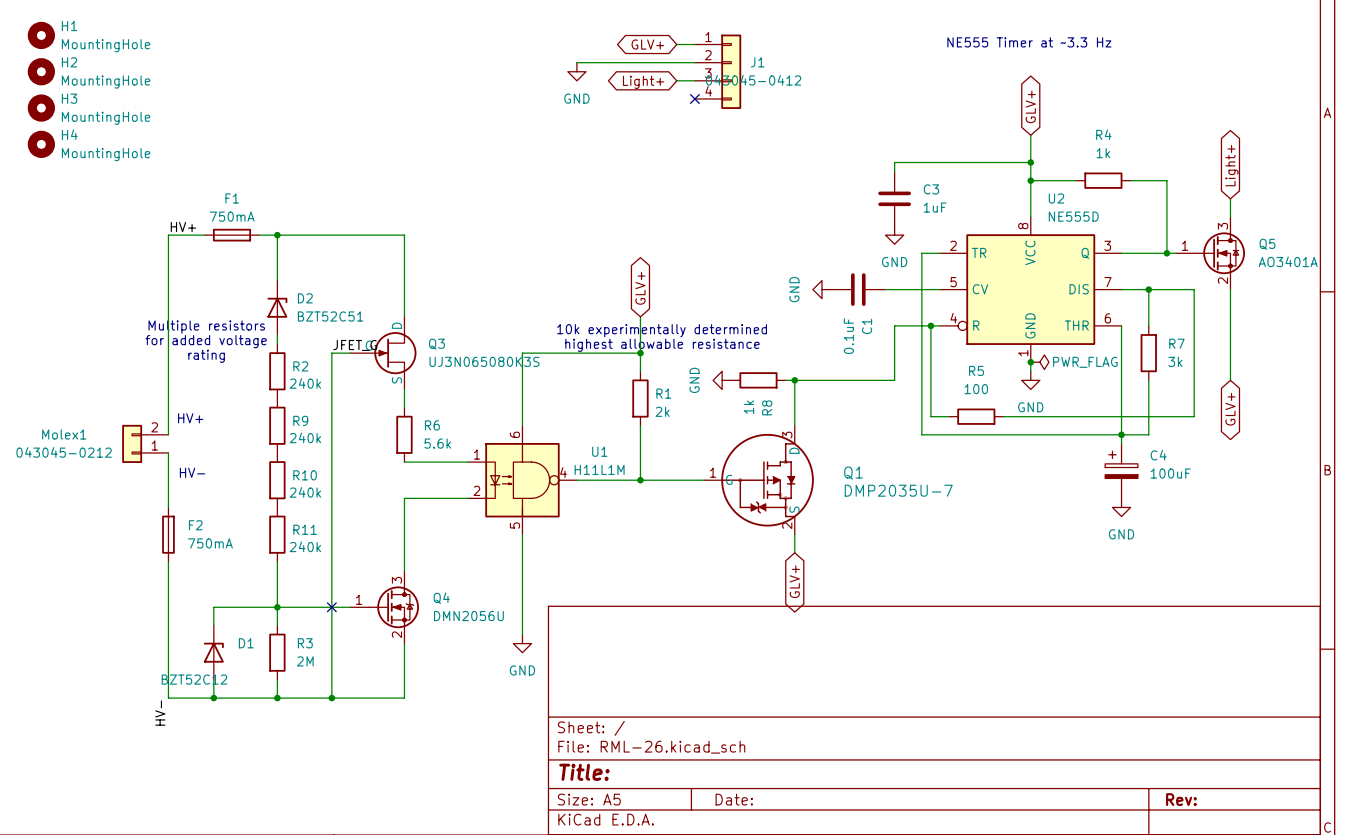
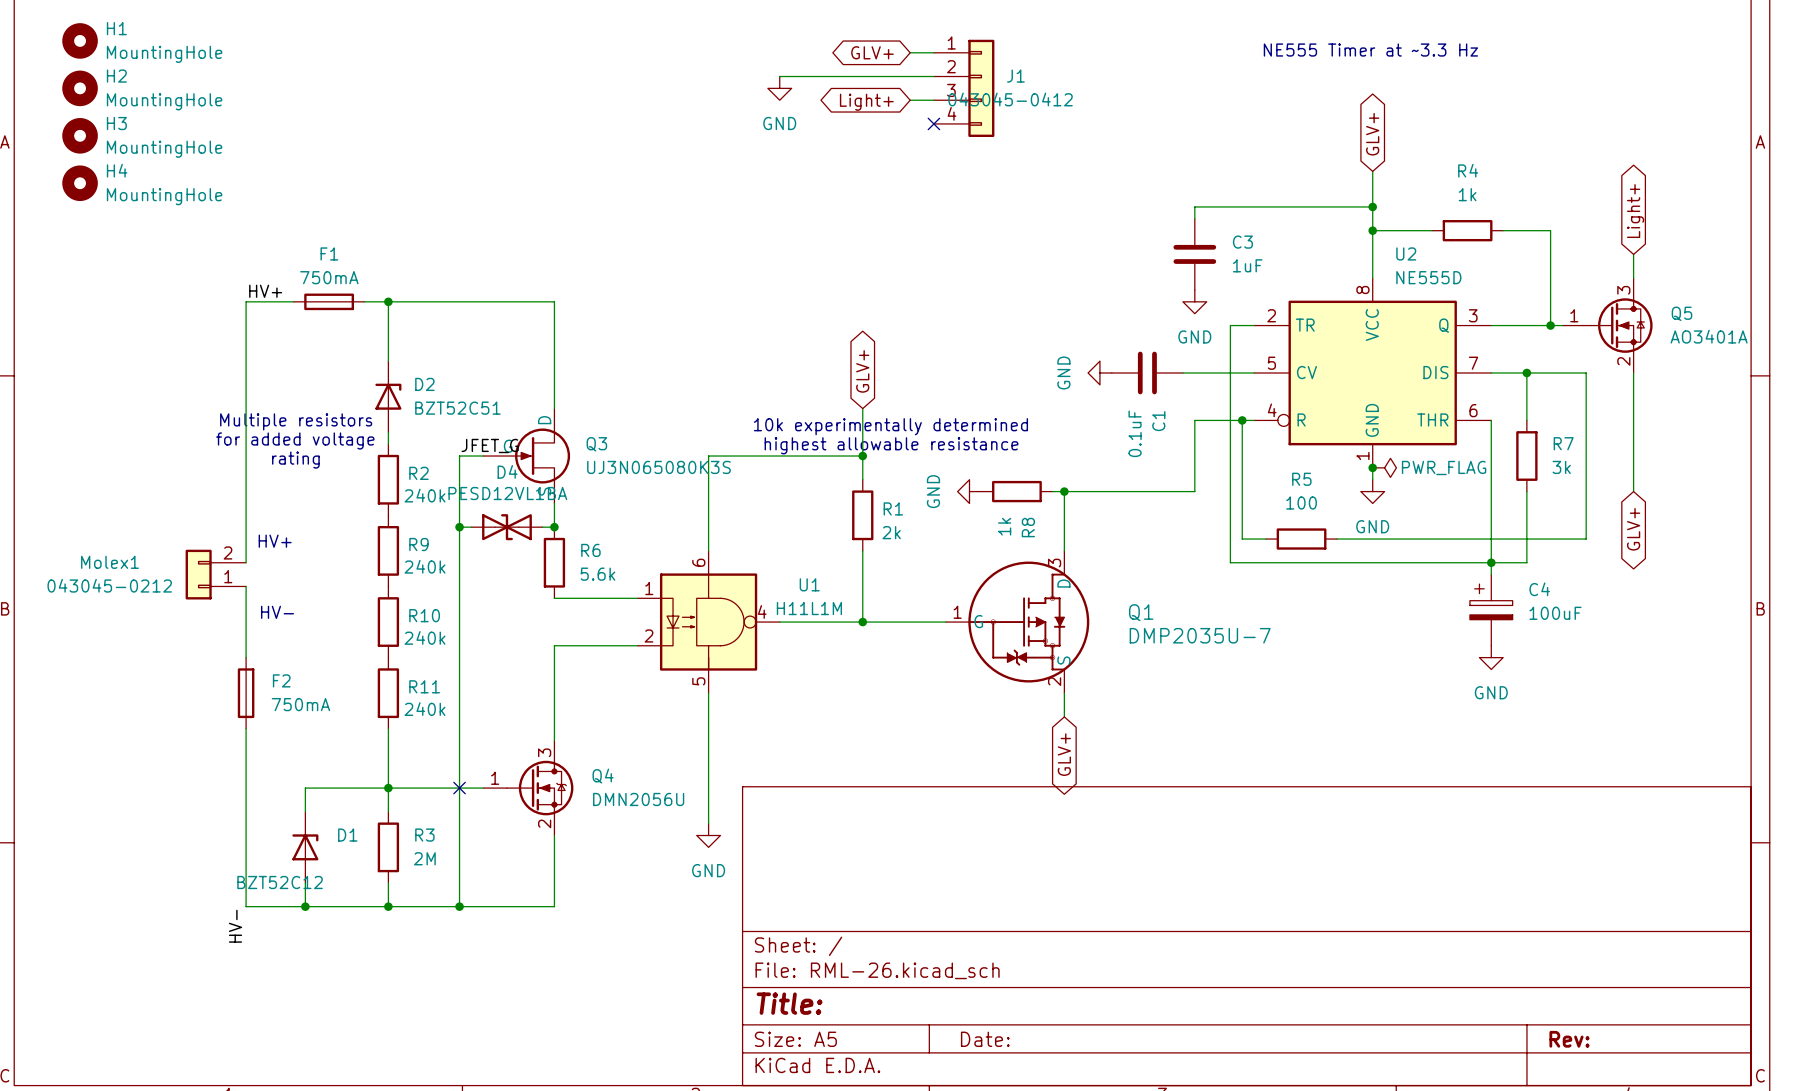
wire: none -> (459, 527) (471, 527)
junction: none -> (459, 527)
D4: none -> PESD12VL1BA (506, 527)
wire: none -> (542, 527) (554, 527)
junction: none -> (554, 527)

